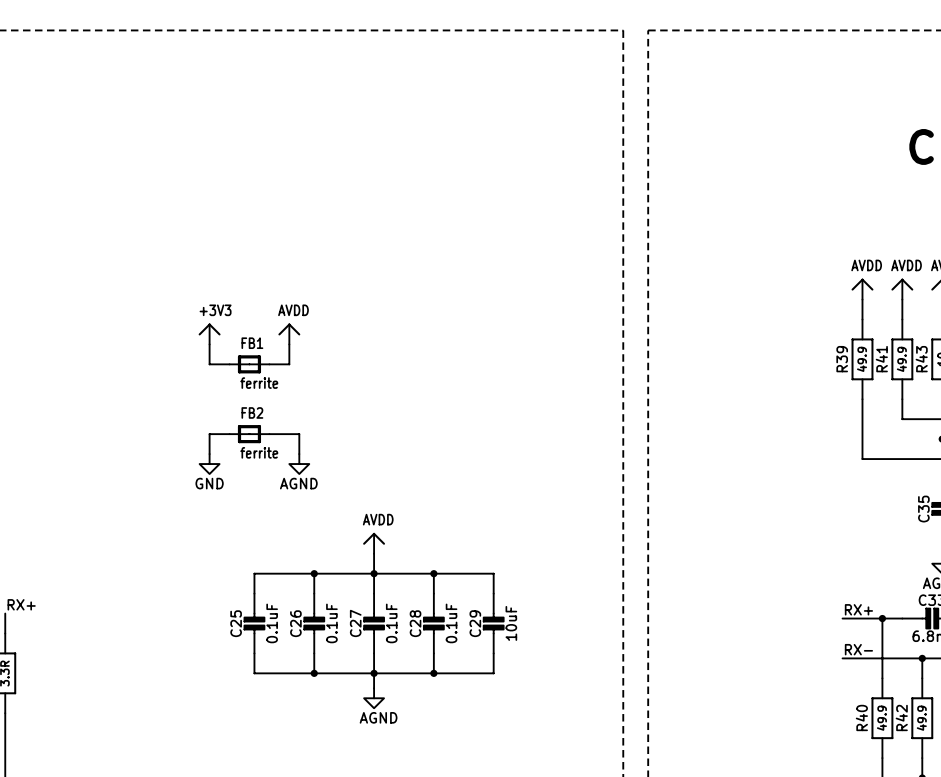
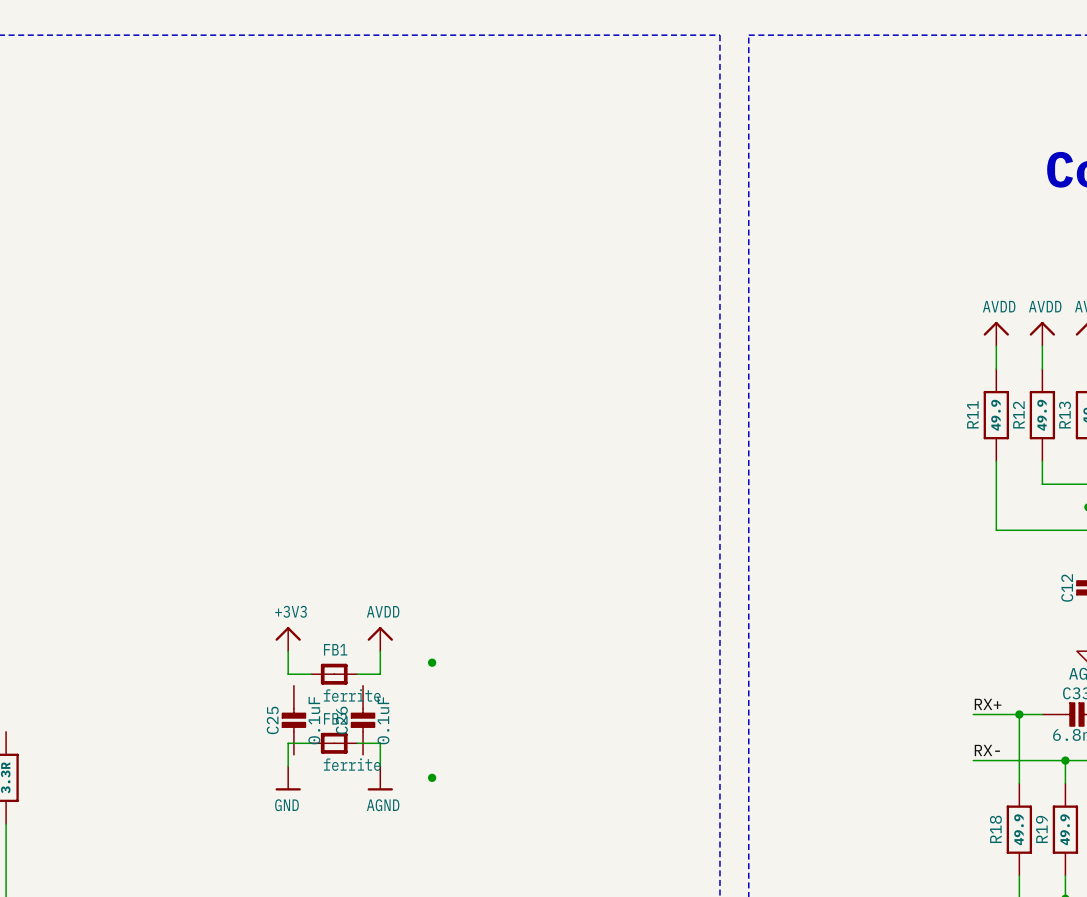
power symbol: +3V3 (209, 333) -> none
power symbol: AVDD (289, 333) -> none
wire: (209, 344) (209, 364) (229, 364) -> none
wire: (289, 344) (289, 364) (269, 364) -> none
R39 name: R39 (842, 359) -> R11 (972, 414)
R41 name: R41 (881, 359) -> R12 (1018, 414)
R43 name: R43 (921, 359) -> R13 (1064, 415)
FB1 position: (249, 364) -> (334, 674)
wire: (229, 434) (209, 434) (209, 454) -> none
FB2 position: (249, 434) -> (334, 743)
wire: (269, 434) (299, 434) (299, 454) -> none
power symbol: GND (209, 464) -> none
power symbol: AGND (299, 464) -> none
C35 name: C35 (923, 509) -> C12 (1067, 587)
power symbol position: AVDD (374, 543) -> AVDD (380, 639)
power symbol: none -> +3V3 (288, 639)
wire: (374, 553) (374, 593) -> none
wire: none -> (288, 651) (288, 674) (311, 674)
wire: none -> (380, 651) (380, 674) (357, 674)
wire: (314, 573) (314, 593) -> none
junction: (314, 573) -> none
wire: (433, 573) (433, 593) -> none
junction: (433, 573) -> none
wire: (254, 593) (254, 573) (493, 573) (493, 593) -> none
label: RX+ (21, 604) -> none
wire: (5, 613) (5, 633) -> none
C27: 0.1uF (374, 623) -> none
C28: 0.1uF (433, 623) -> none
C29: 10uF (493, 623) -> none
wire: none -> (311, 743) (288, 743) (288, 766)
wire: none -> (357, 743) (380, 743) (380, 766)
wire: (254, 653) (254, 673) (493, 673) (493, 653) -> none
wire: (314, 653) (314, 673) -> none
wire: (374, 653) (374, 688) -> none
wire: (433, 653) (433, 673) -> none
power symbol: none -> GND (288, 778)
junction: (314, 673) -> none
power symbol: none -> AGND (380, 778)
junction: (433, 673) -> none
power symbol: AGND (374, 698) -> none
R40 name: R40 (861, 717) -> R18 (995, 829)
R42 name: R42 (901, 717) -> R19 (1041, 829)

